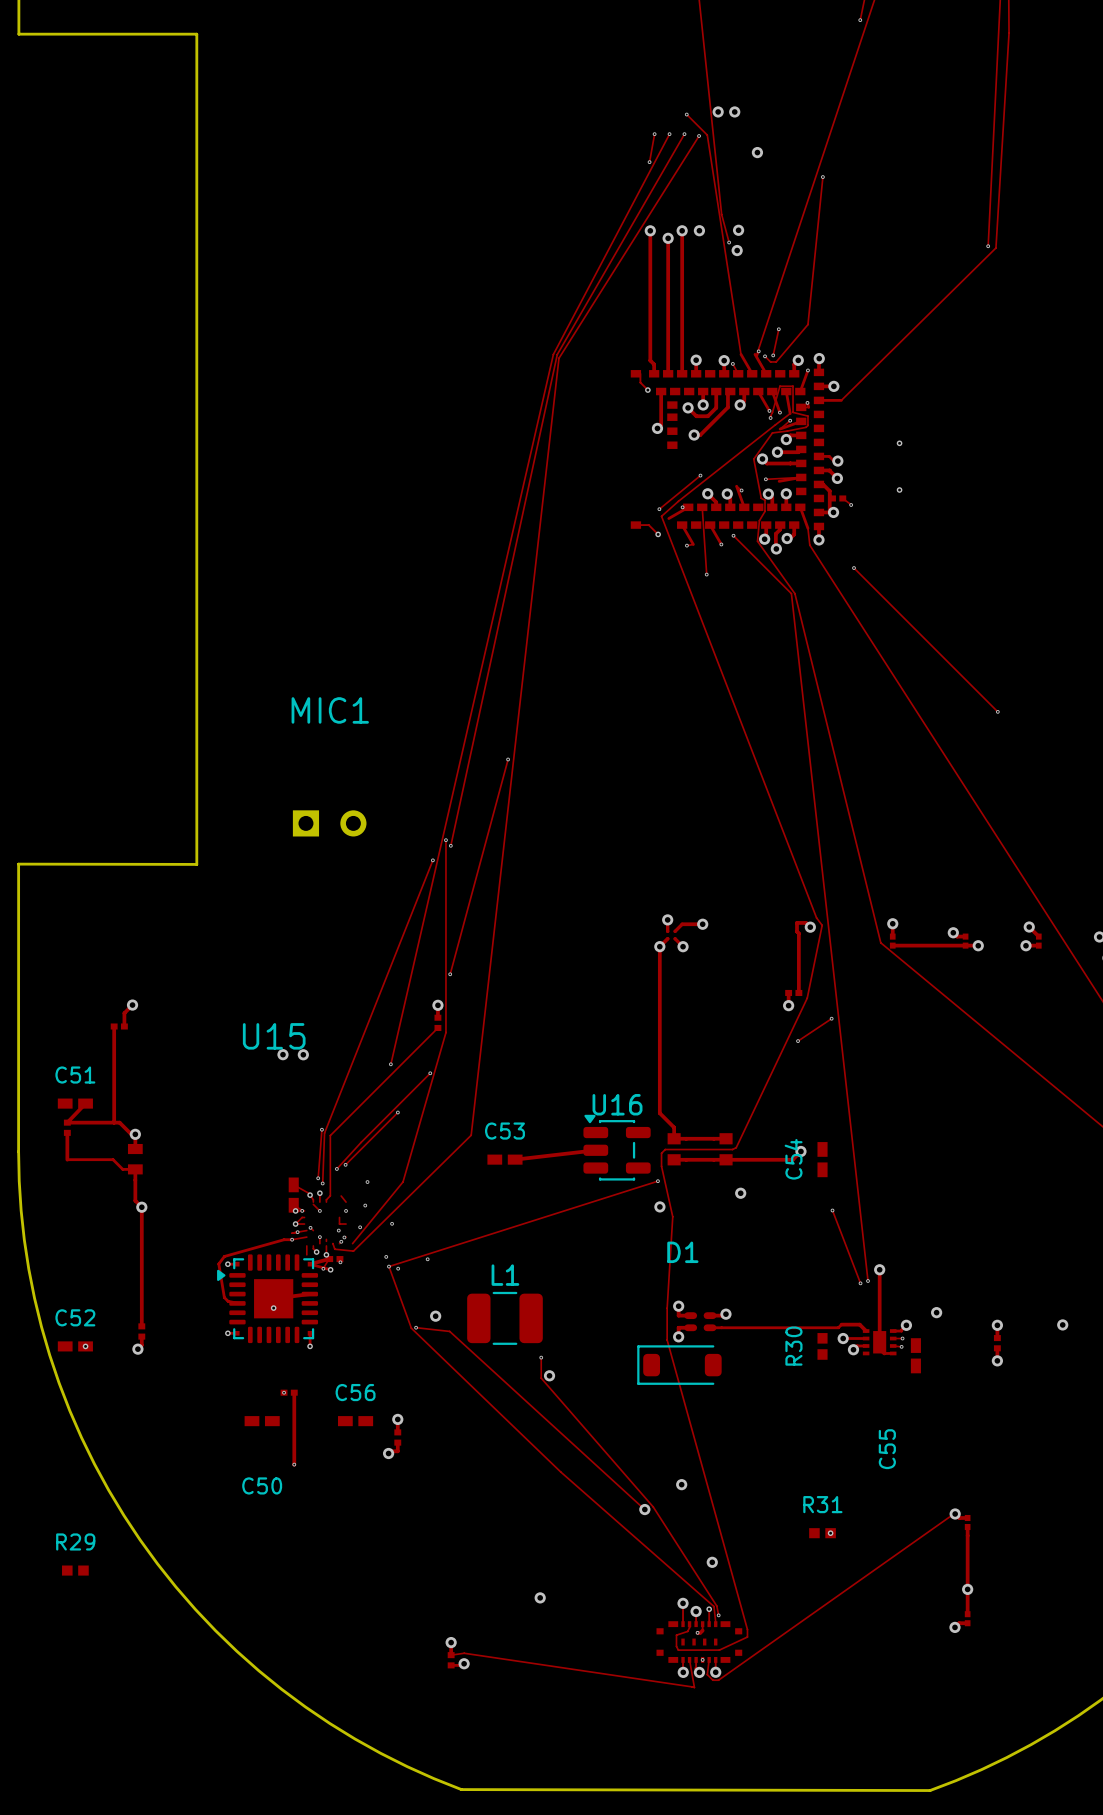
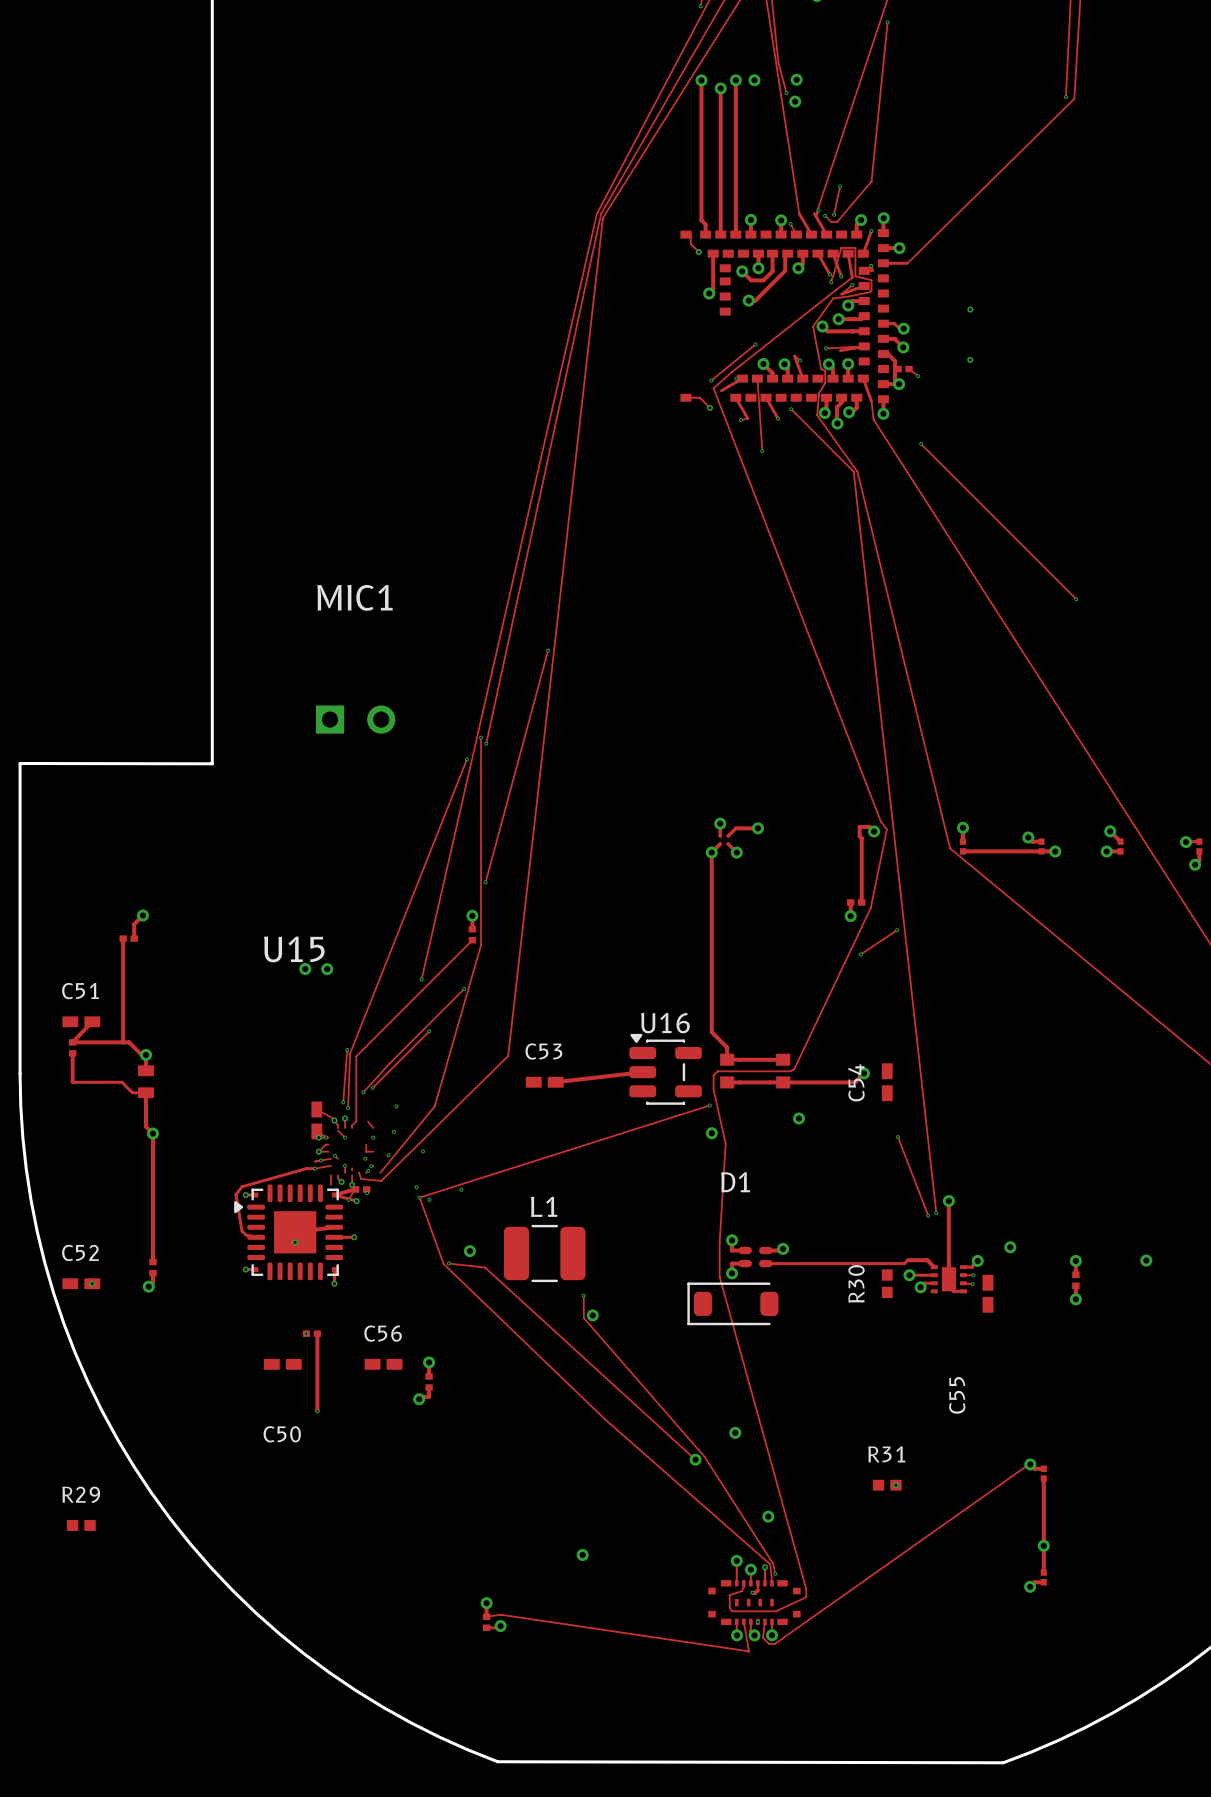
track: none -> (334, 1237) (354, 1237)
via: none -> (354, 1237)

